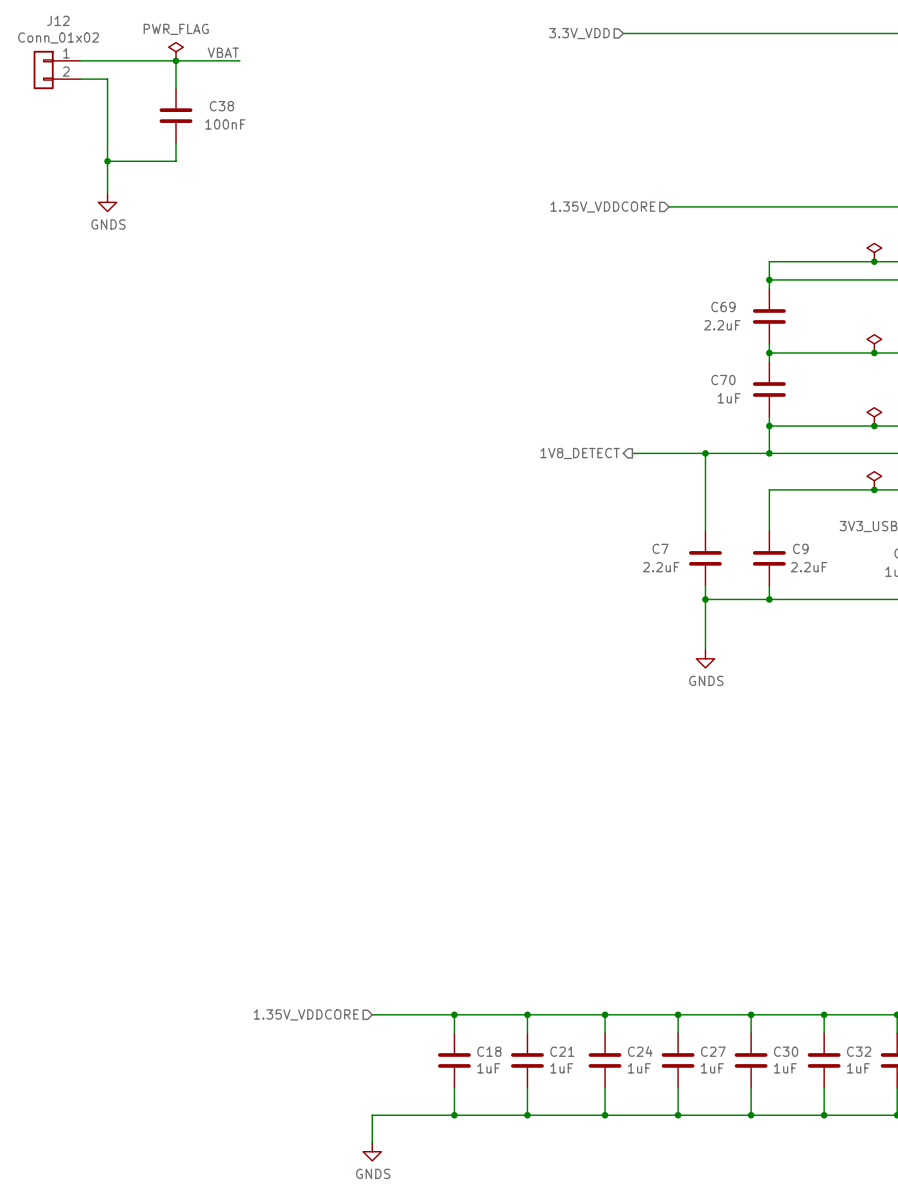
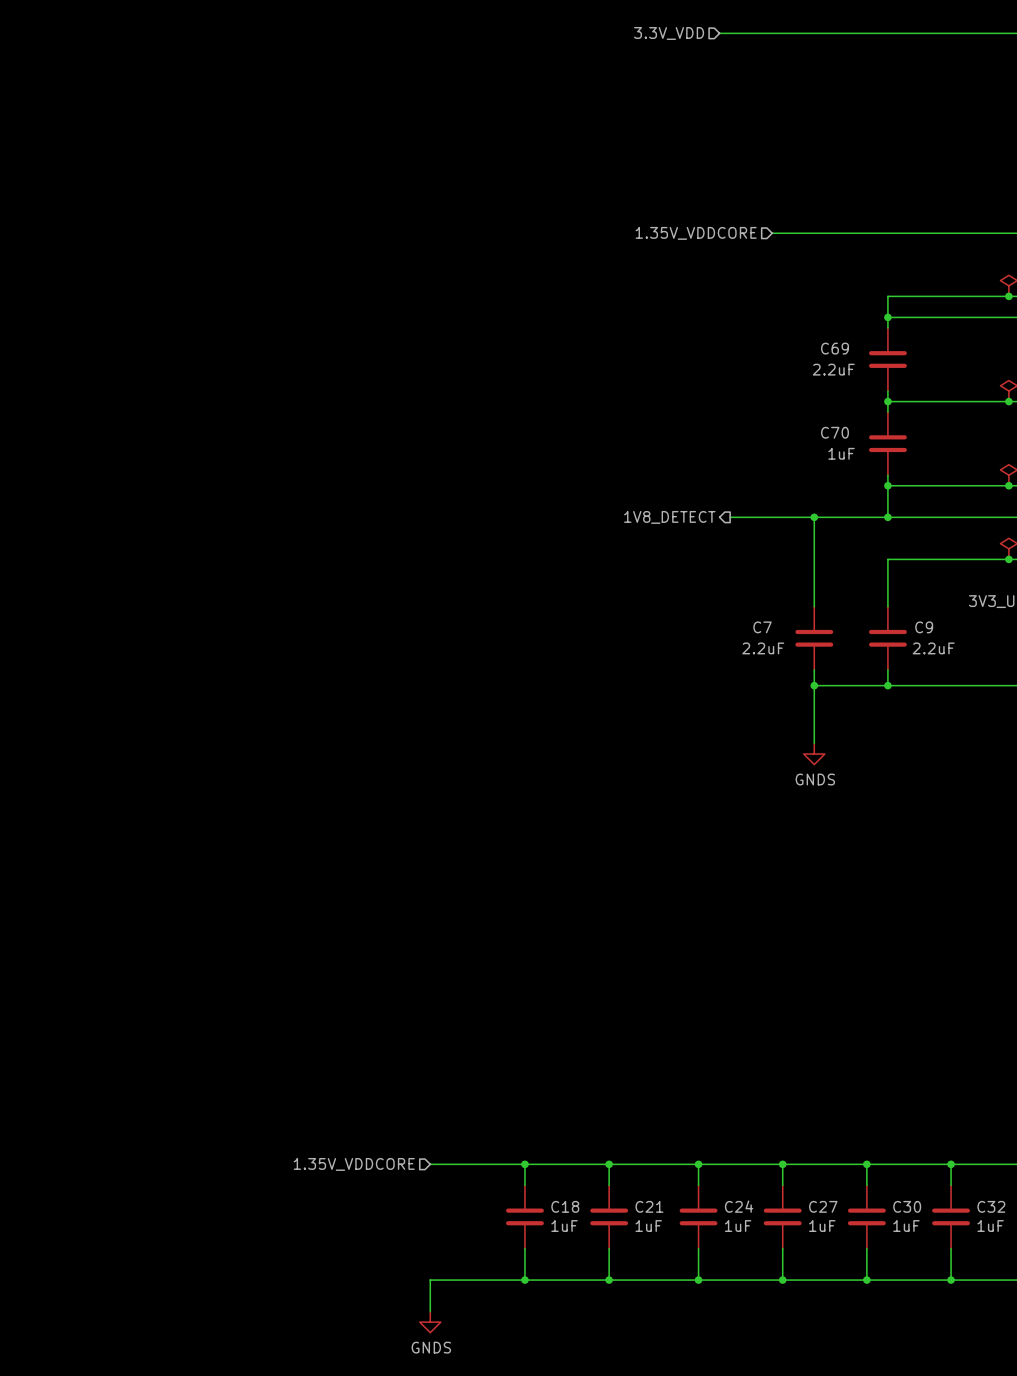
power symbol: PWR_FLAG (176, 51) -> none
label: VBAT (223, 52) -> none
wire: (80, 60) (239, 60) -> none
wire: (176, 60) (176, 88) -> none
junction: (176, 60) -> none
J12: Conn_01x02 (56, 69) -> none
wire: (80, 79) (107, 79) (107, 193) -> none
C38: 100nF (176, 115) -> none
wire: (176, 143) (176, 161) (107, 161) -> none
junction: (107, 161) -> none
power symbol: GNDS (107, 202) -> none

